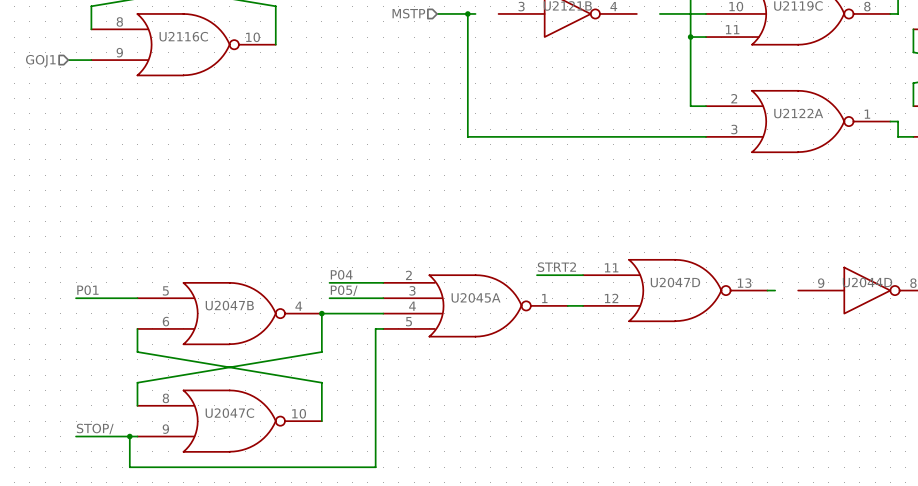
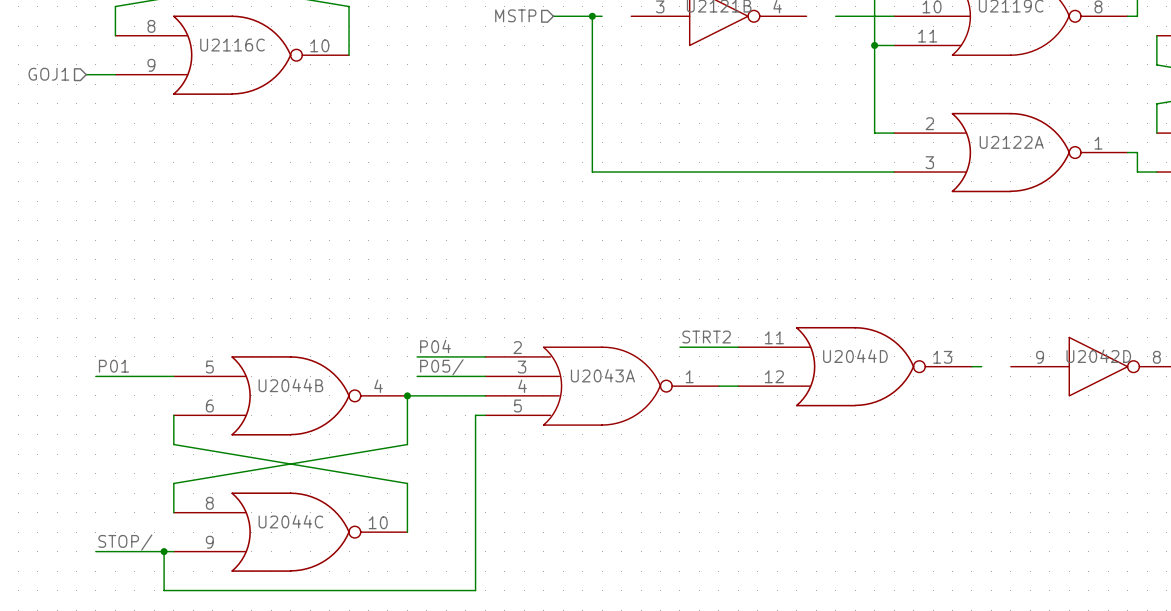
U2047D name: U2047D (675, 282) -> U2044D (855, 356)
U2044D name: U2044D (867, 282) -> U2042D (1098, 356)
U2045A name: U2045A (476, 297) -> U2043A (602, 375)
U2047B name: U2047B (229, 305) -> U2044B (290, 385)
U2047C name: U2047C (229, 413) -> U2044C (290, 521)

